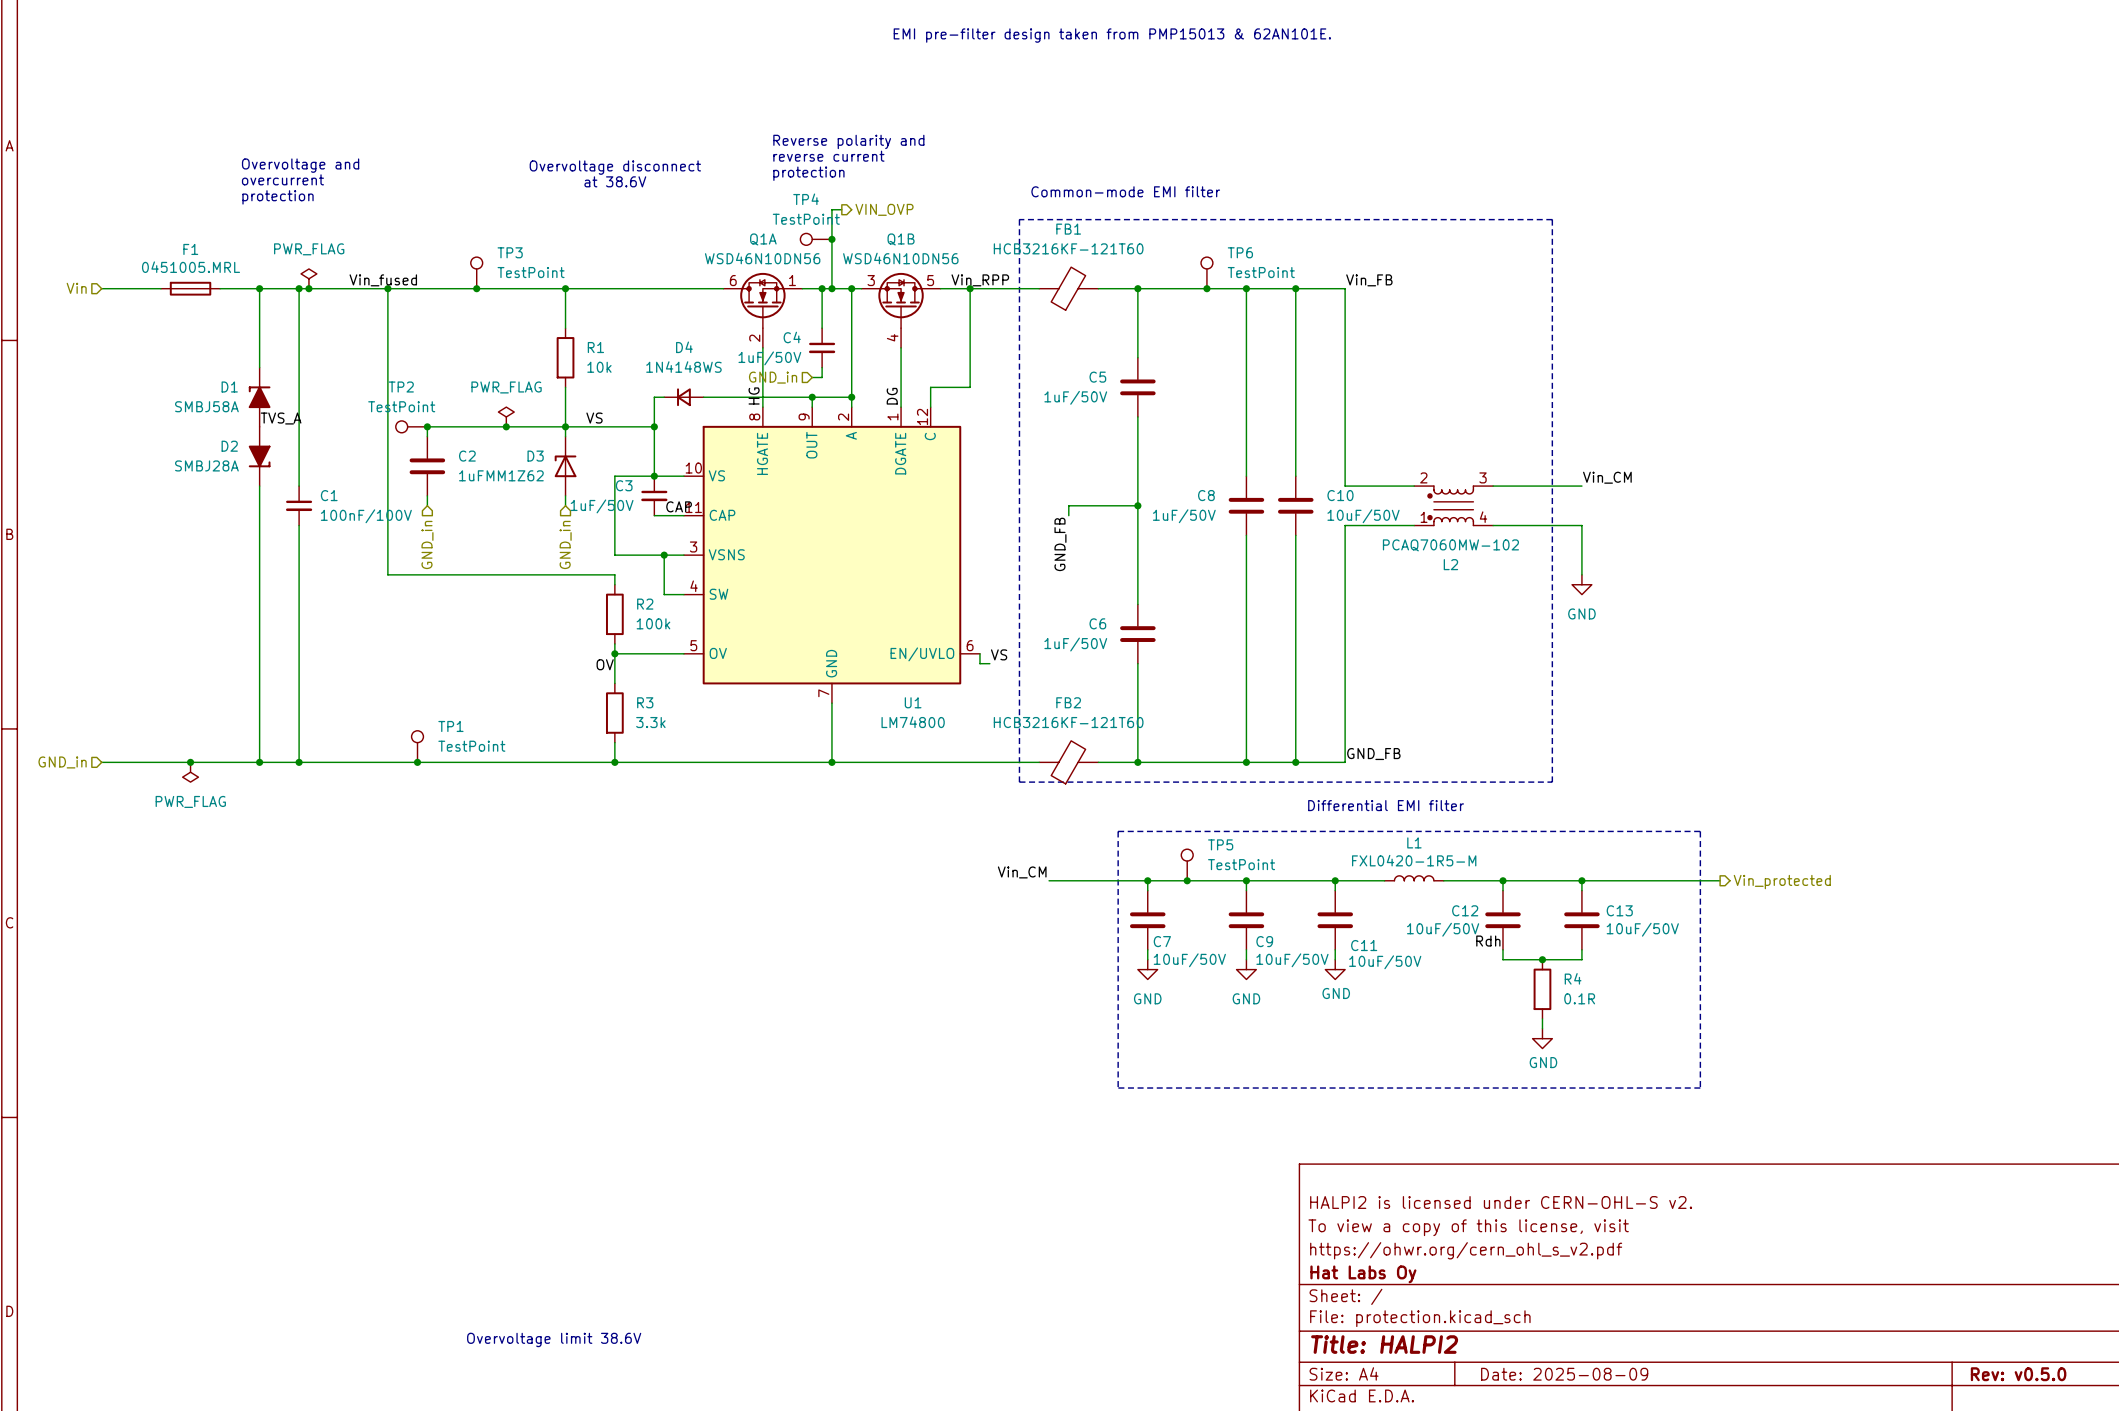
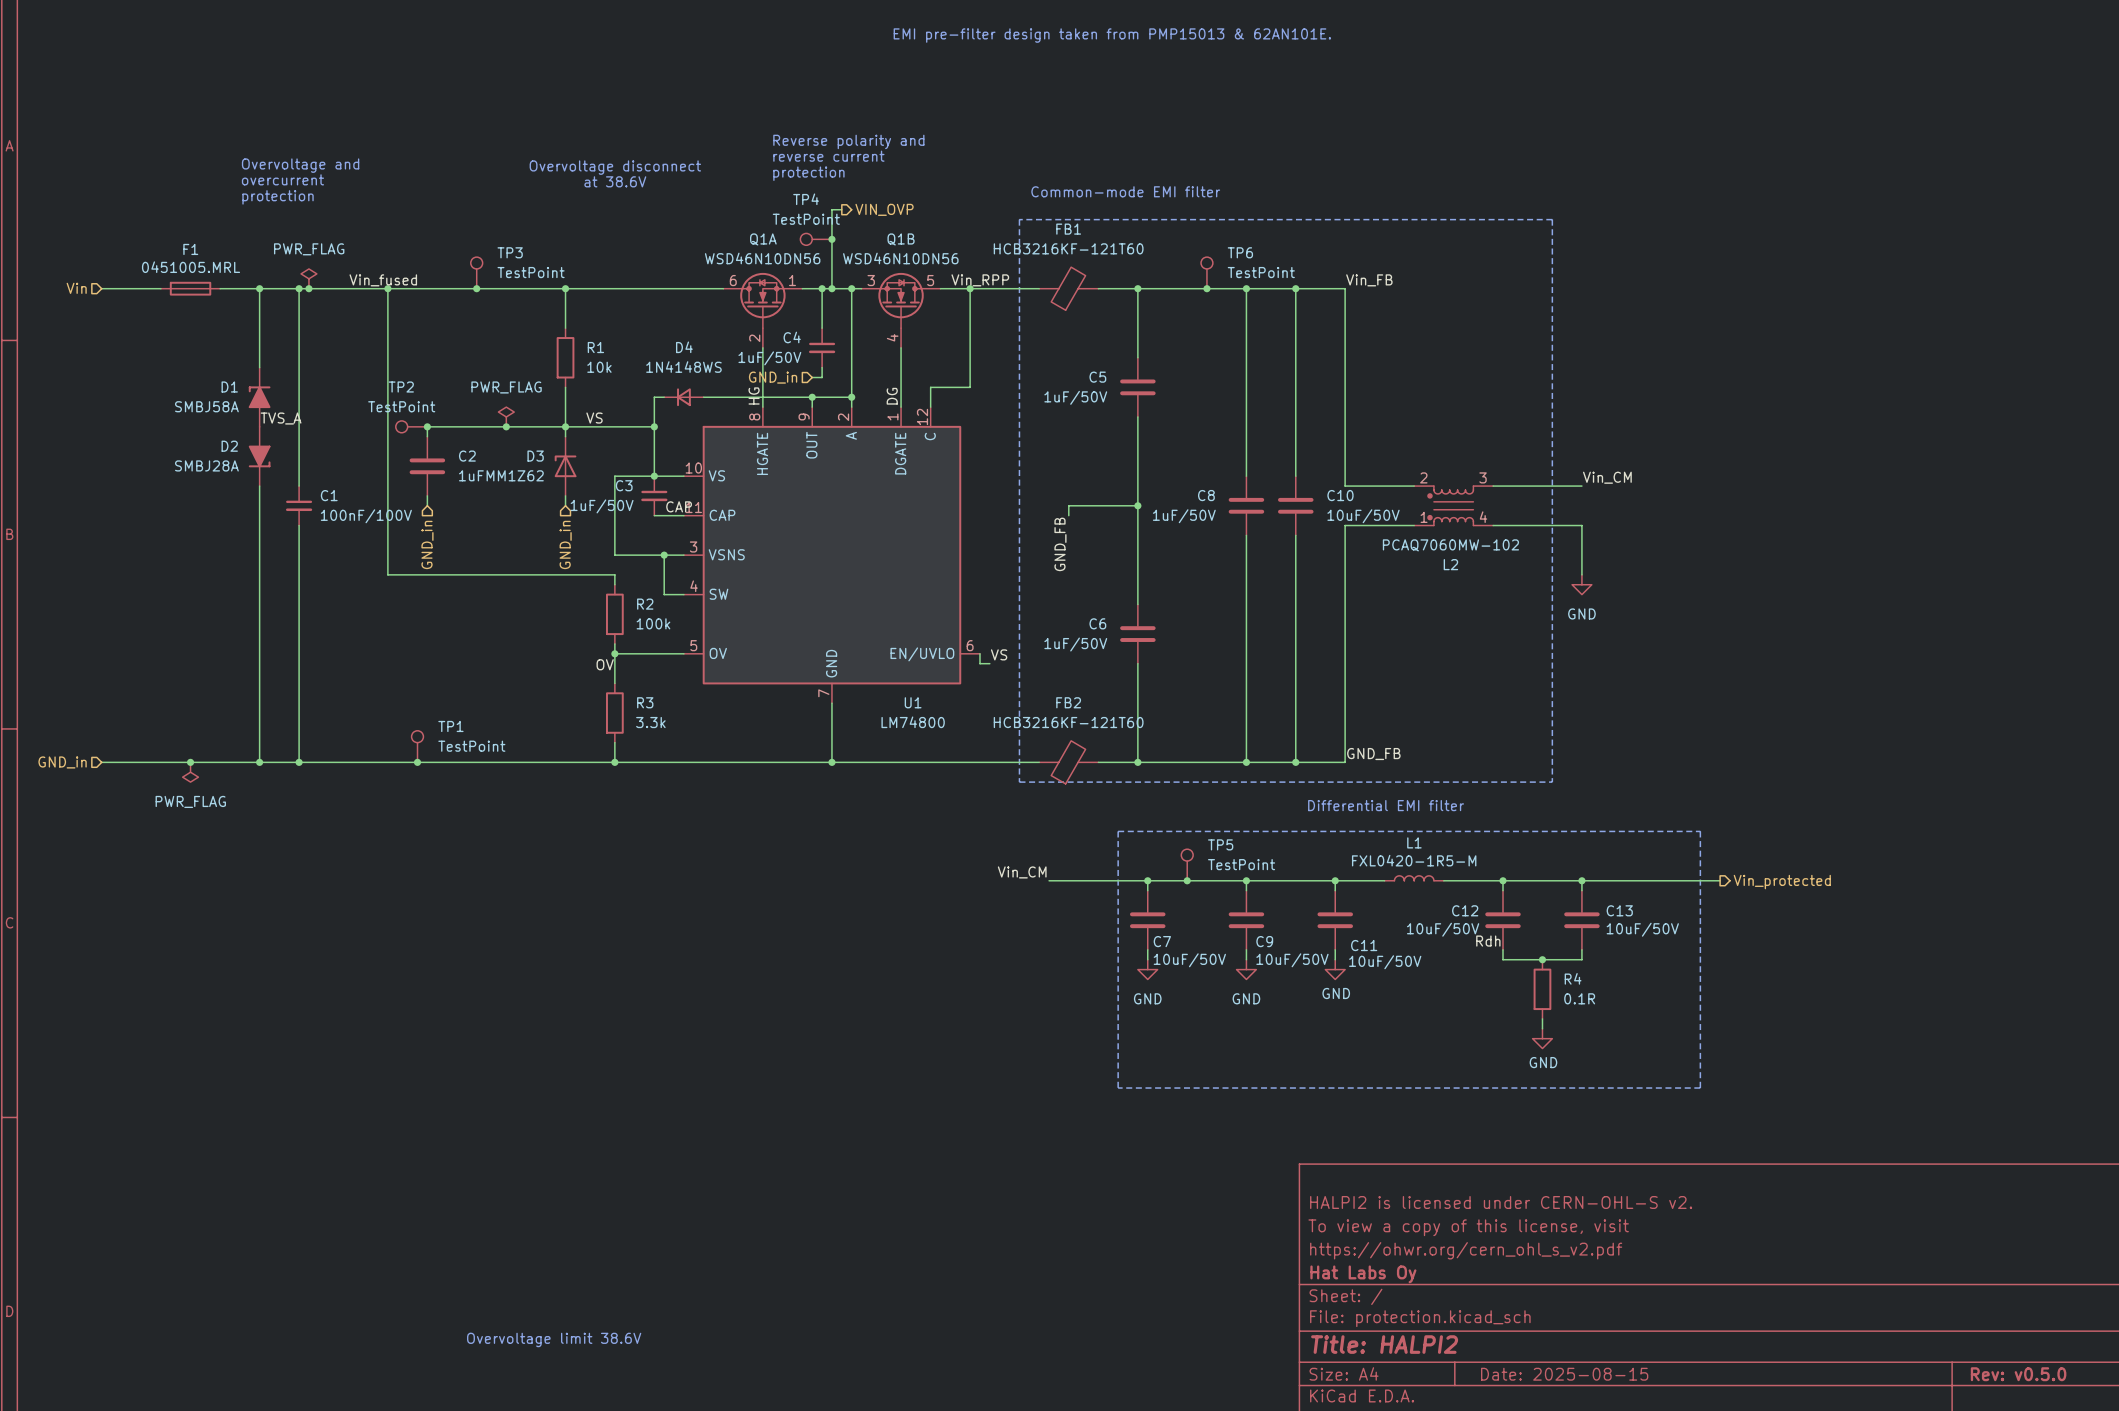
title block: Date: 2025-08-09 (1564, 1374) -> Date: 2025-08-15 (1564, 1374)

